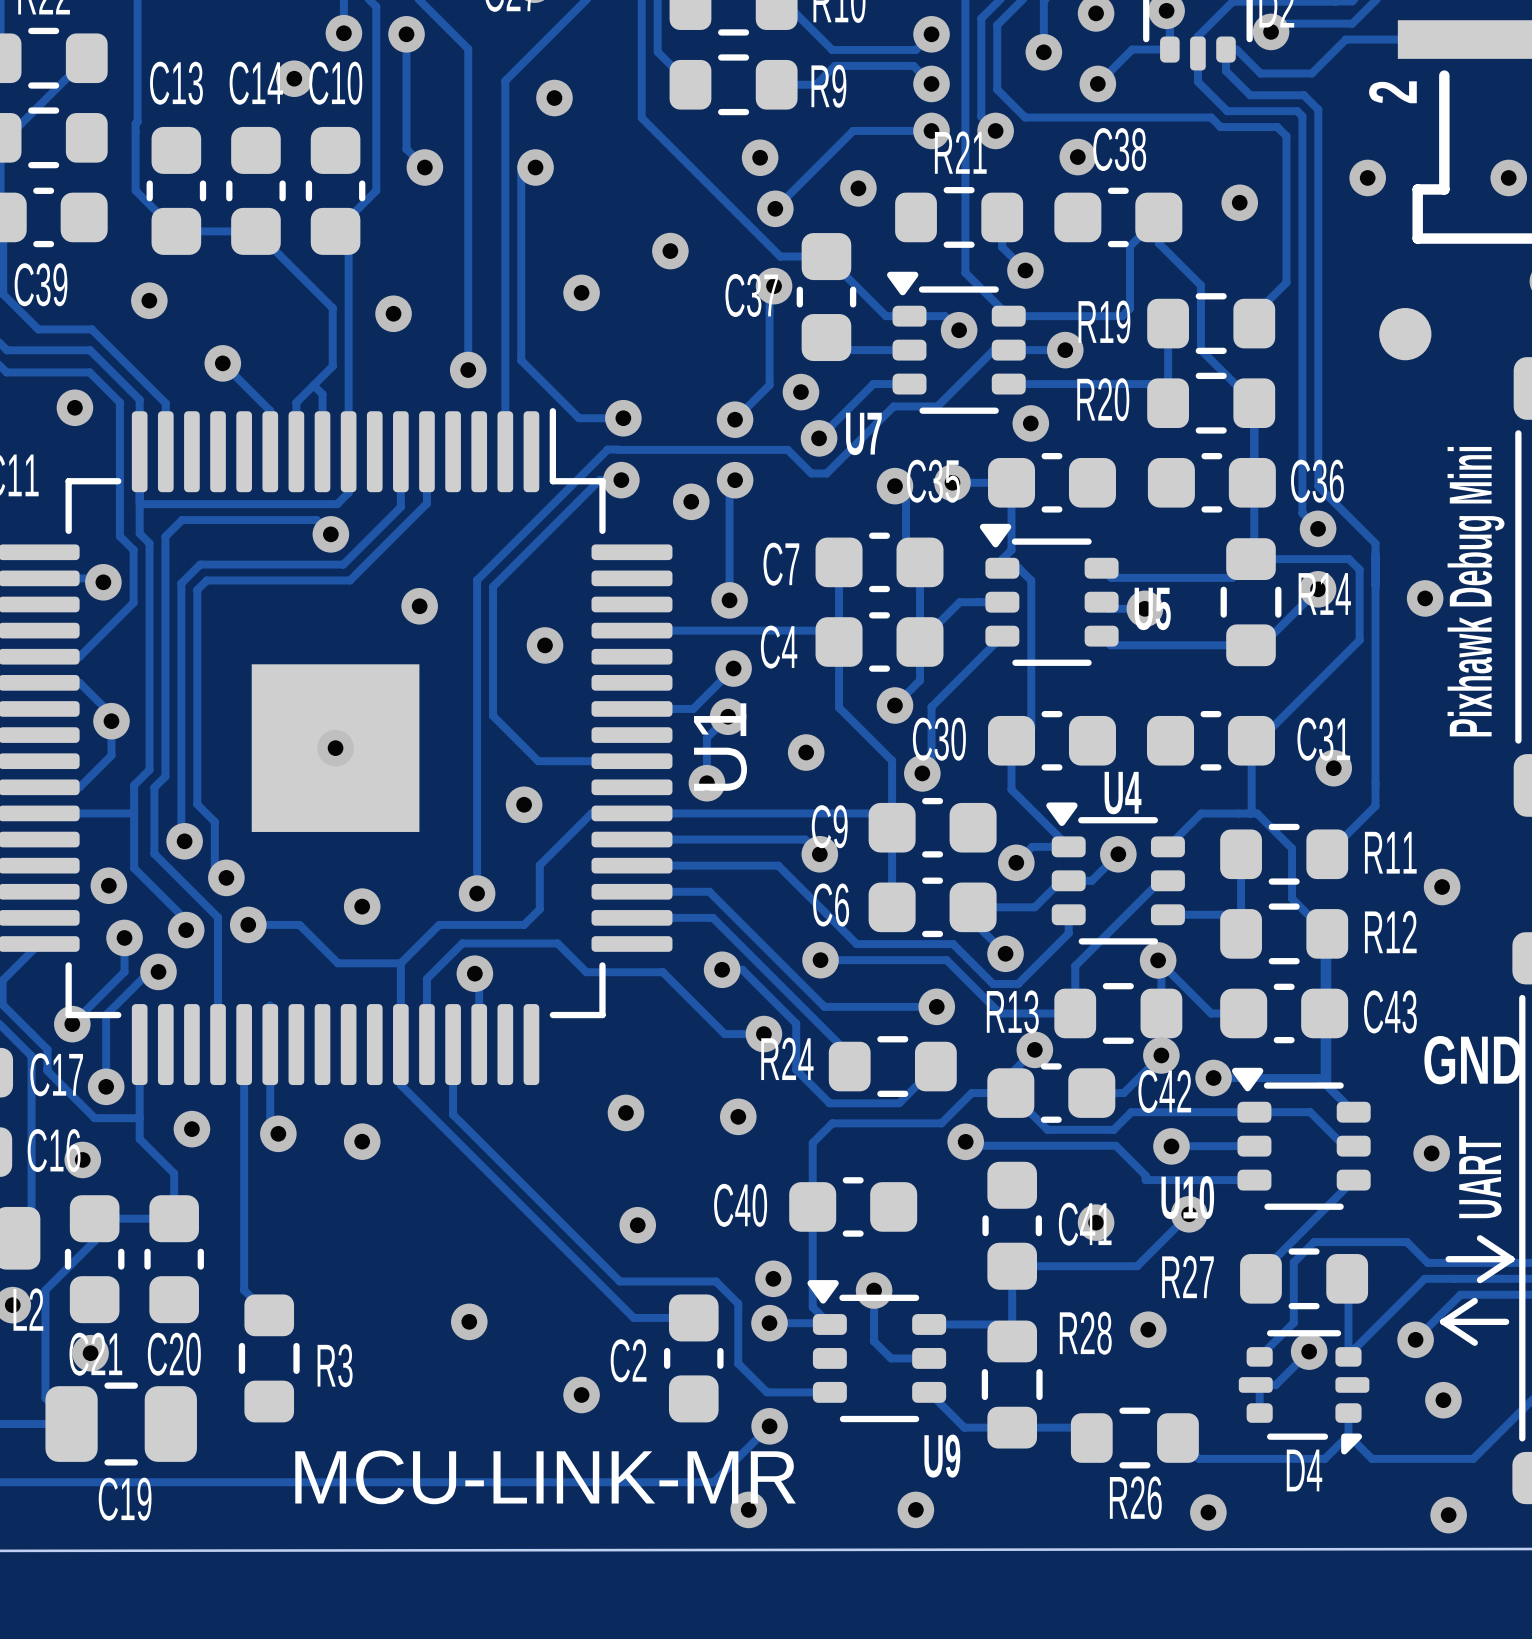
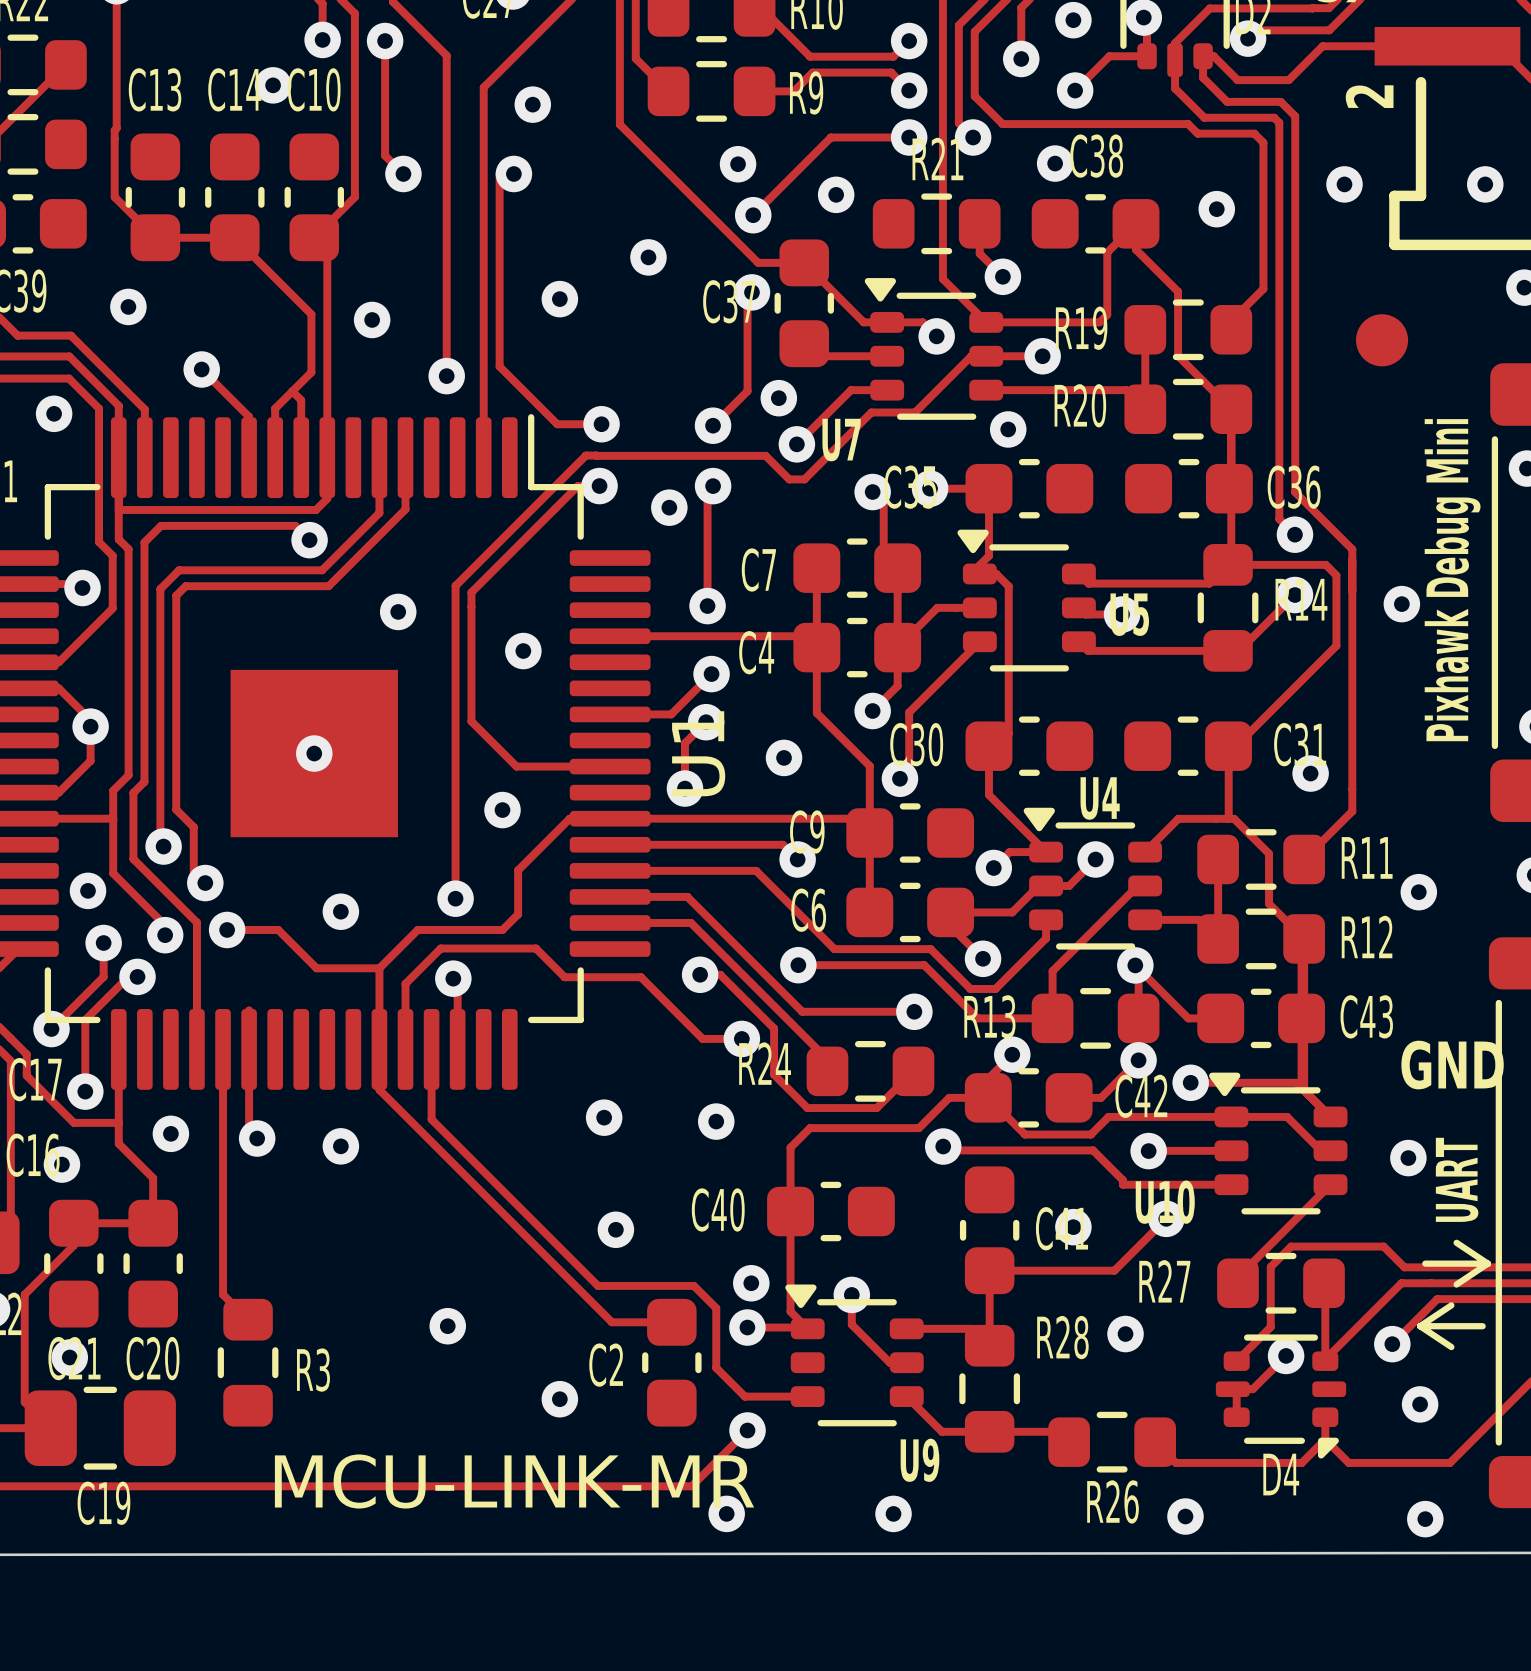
track: (874, 1320) (874, 1341) (891, 1358) (912, 1358) -> (851, 1324) (889, 1362)

